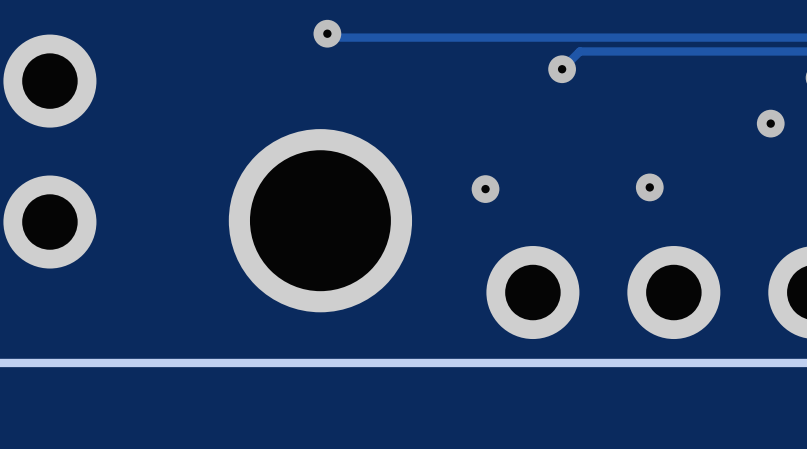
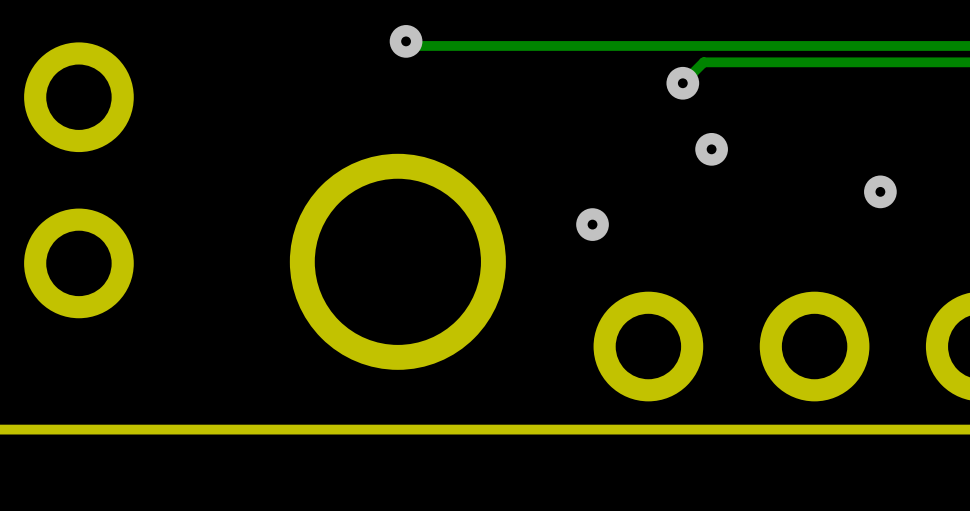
via: (770, 123) -> none
via: none -> (711, 149)
via: none -> (880, 191)
via: (649, 187) -> none

